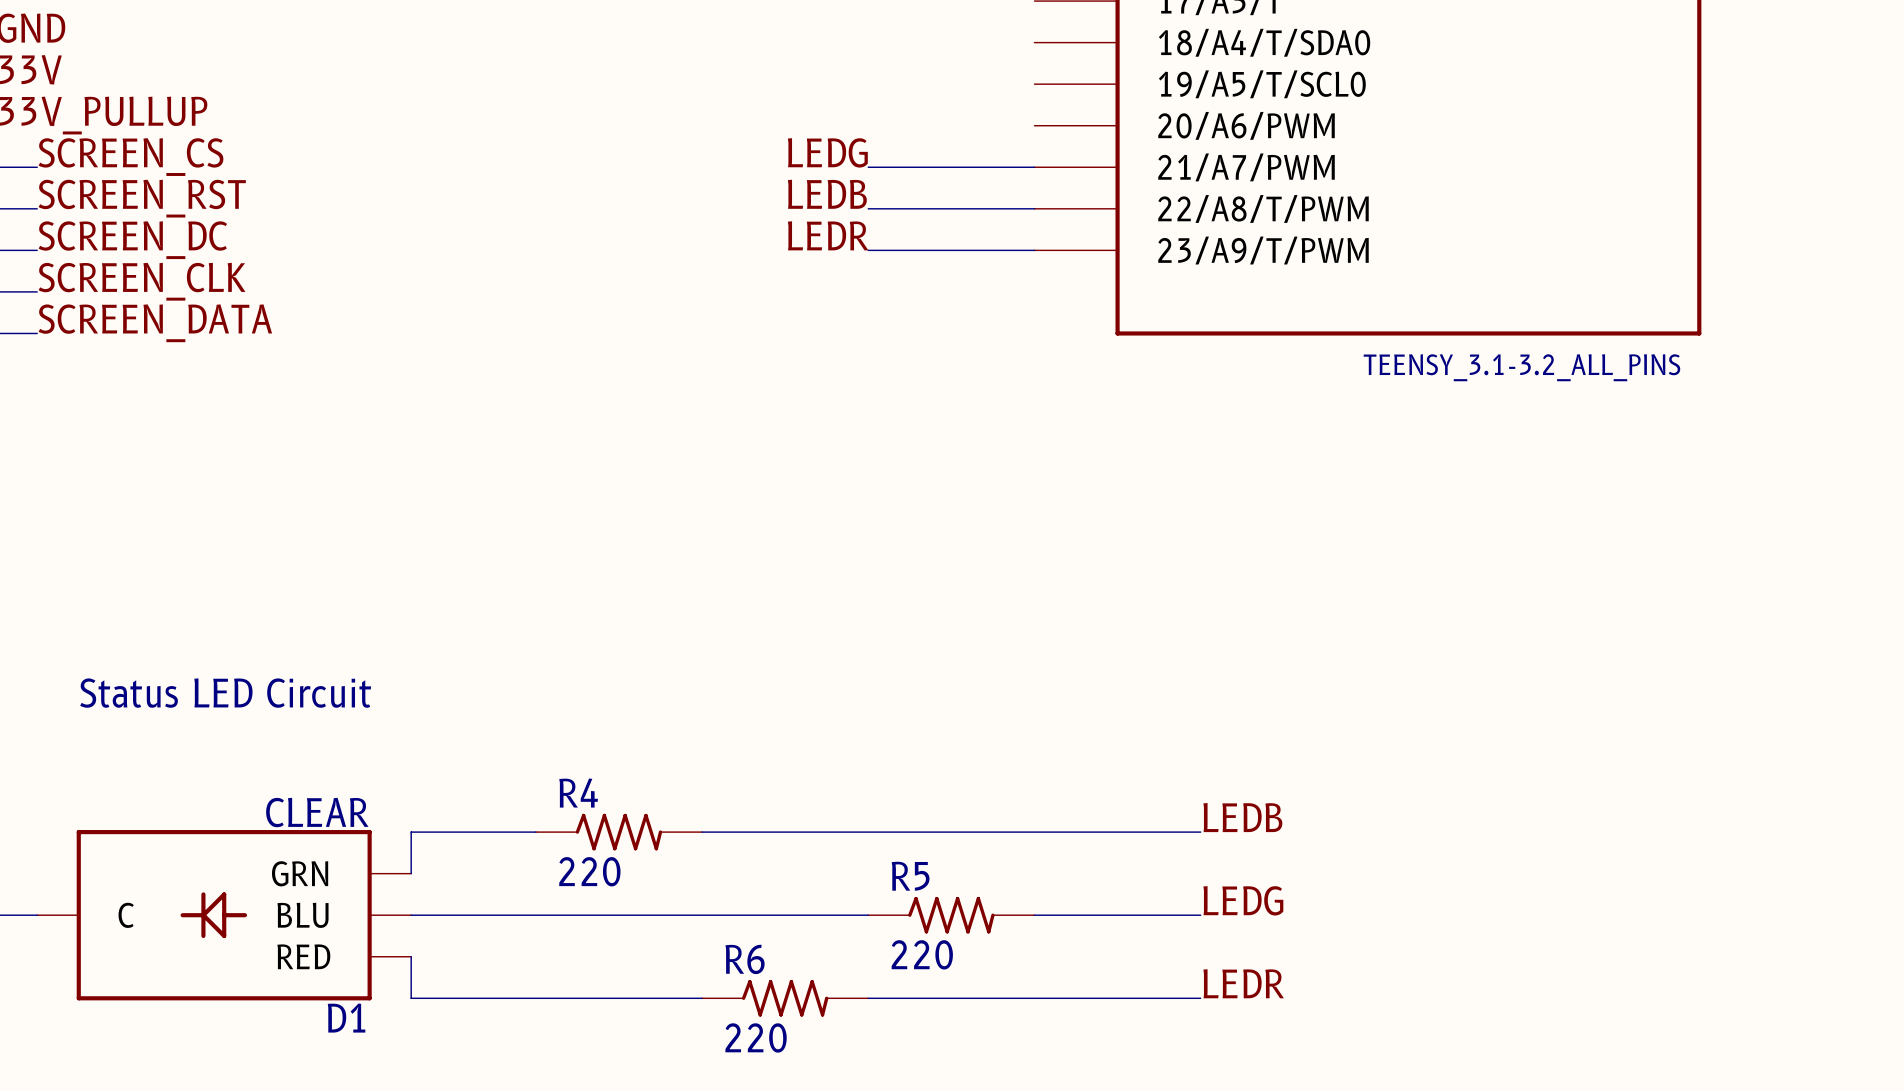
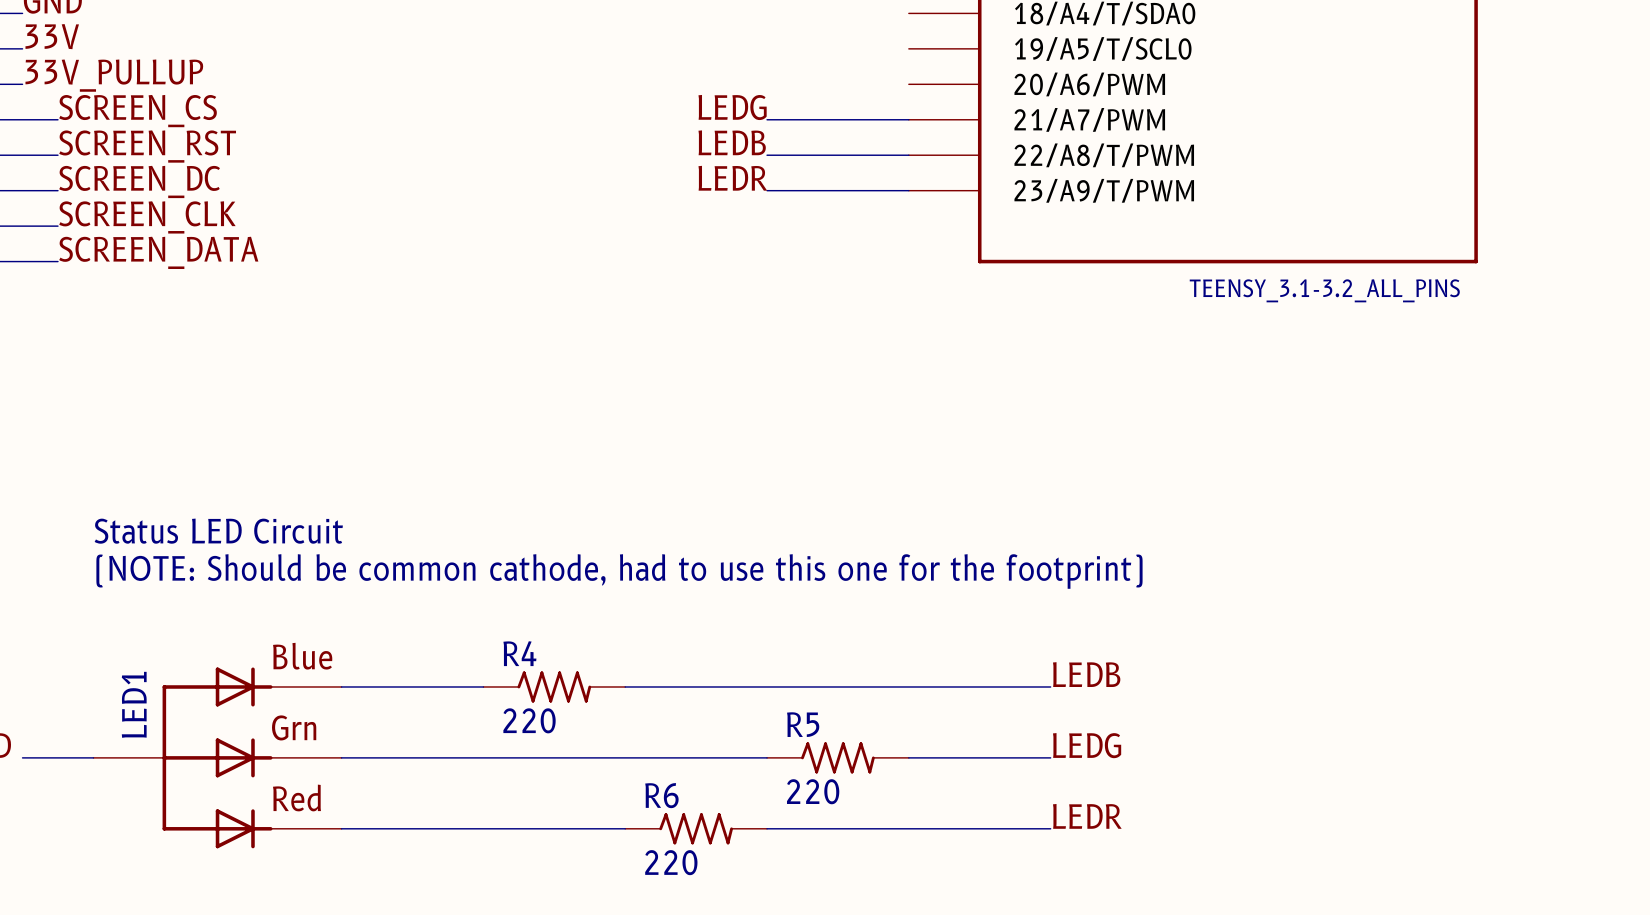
text: none -> Status LED Circuit (218, 531)
text: Status LED Circuit (225, 693) -> (NOTE: Should be common cathode, had to use this one for the footprint) (619, 571)
wire: (411, 832) (411, 873) -> (377, 686) (341, 686)
D1: CLEAR (224, 915) -> none
LED1: none -> (217, 757)
wire: (411, 956) (411, 998) -> (341, 828) (377, 828)

